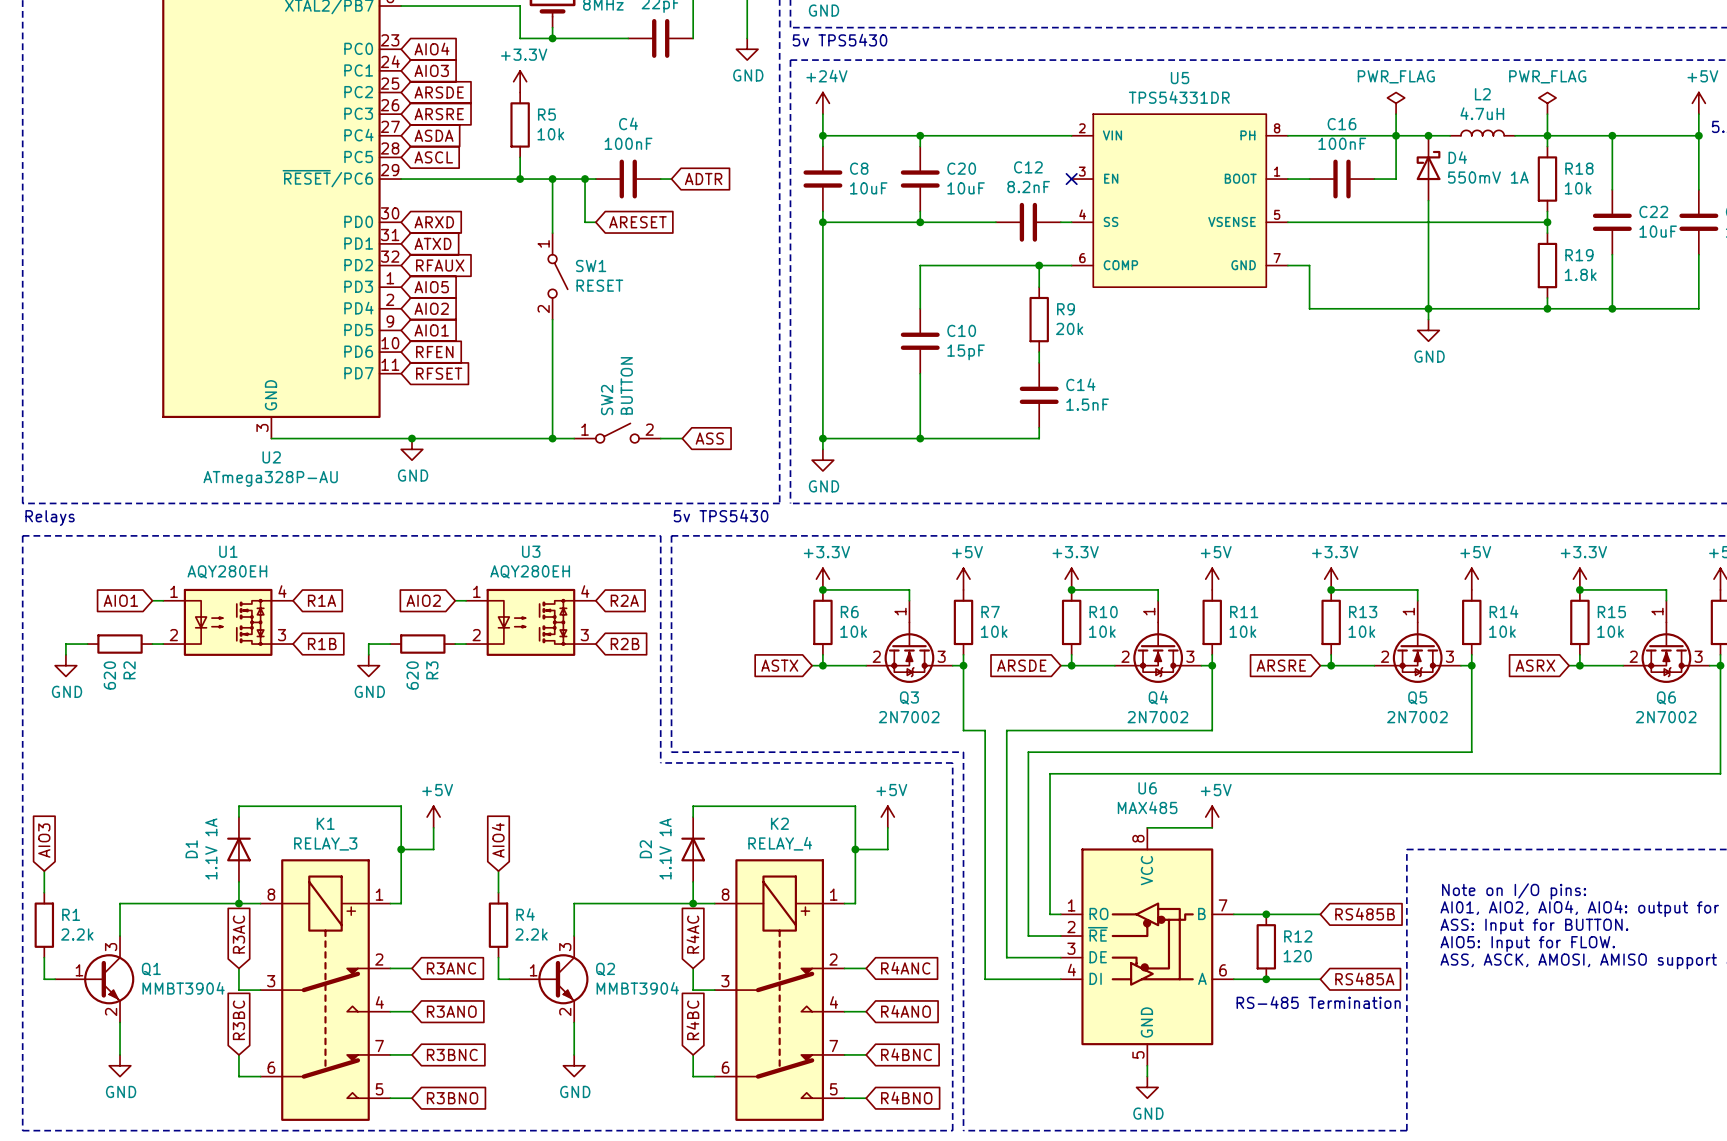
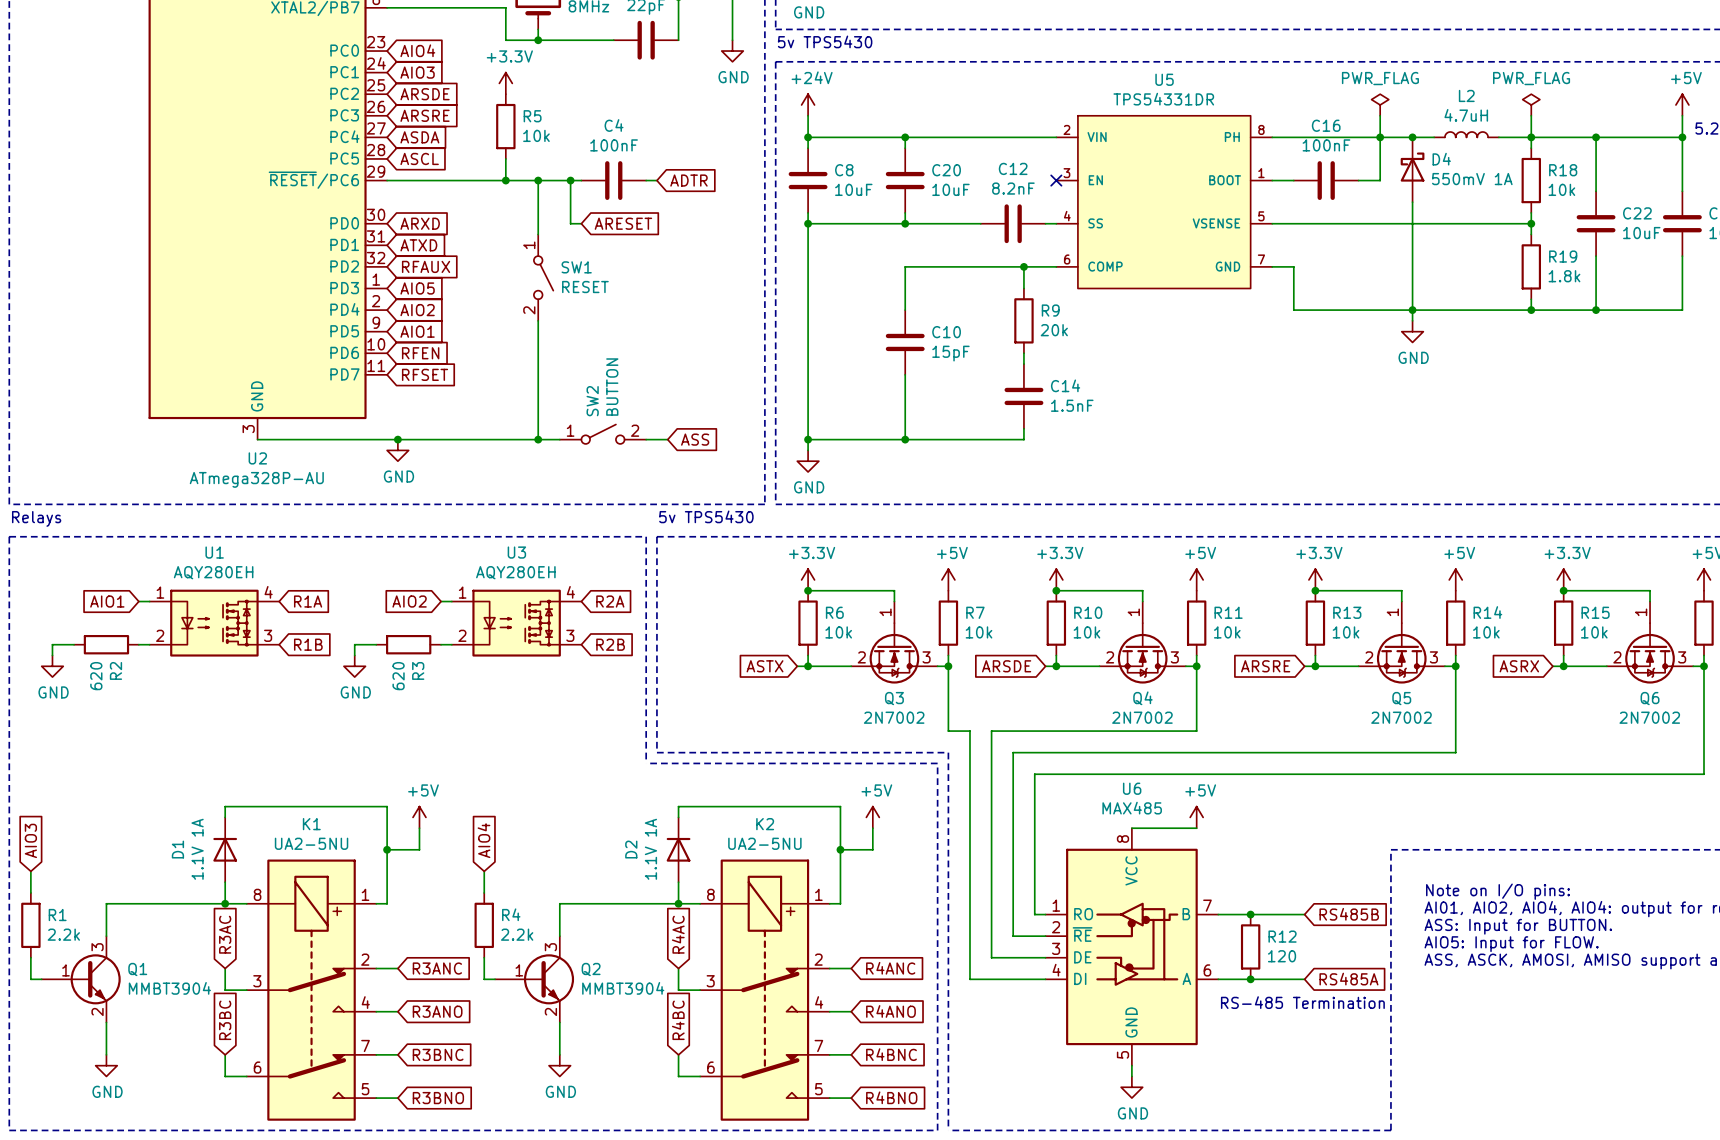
K1 value: RELAY_3 (325, 843) -> UA2-5NU (311, 843)
K2 value: RELAY_4 (780, 843) -> UA2-5NU (764, 843)

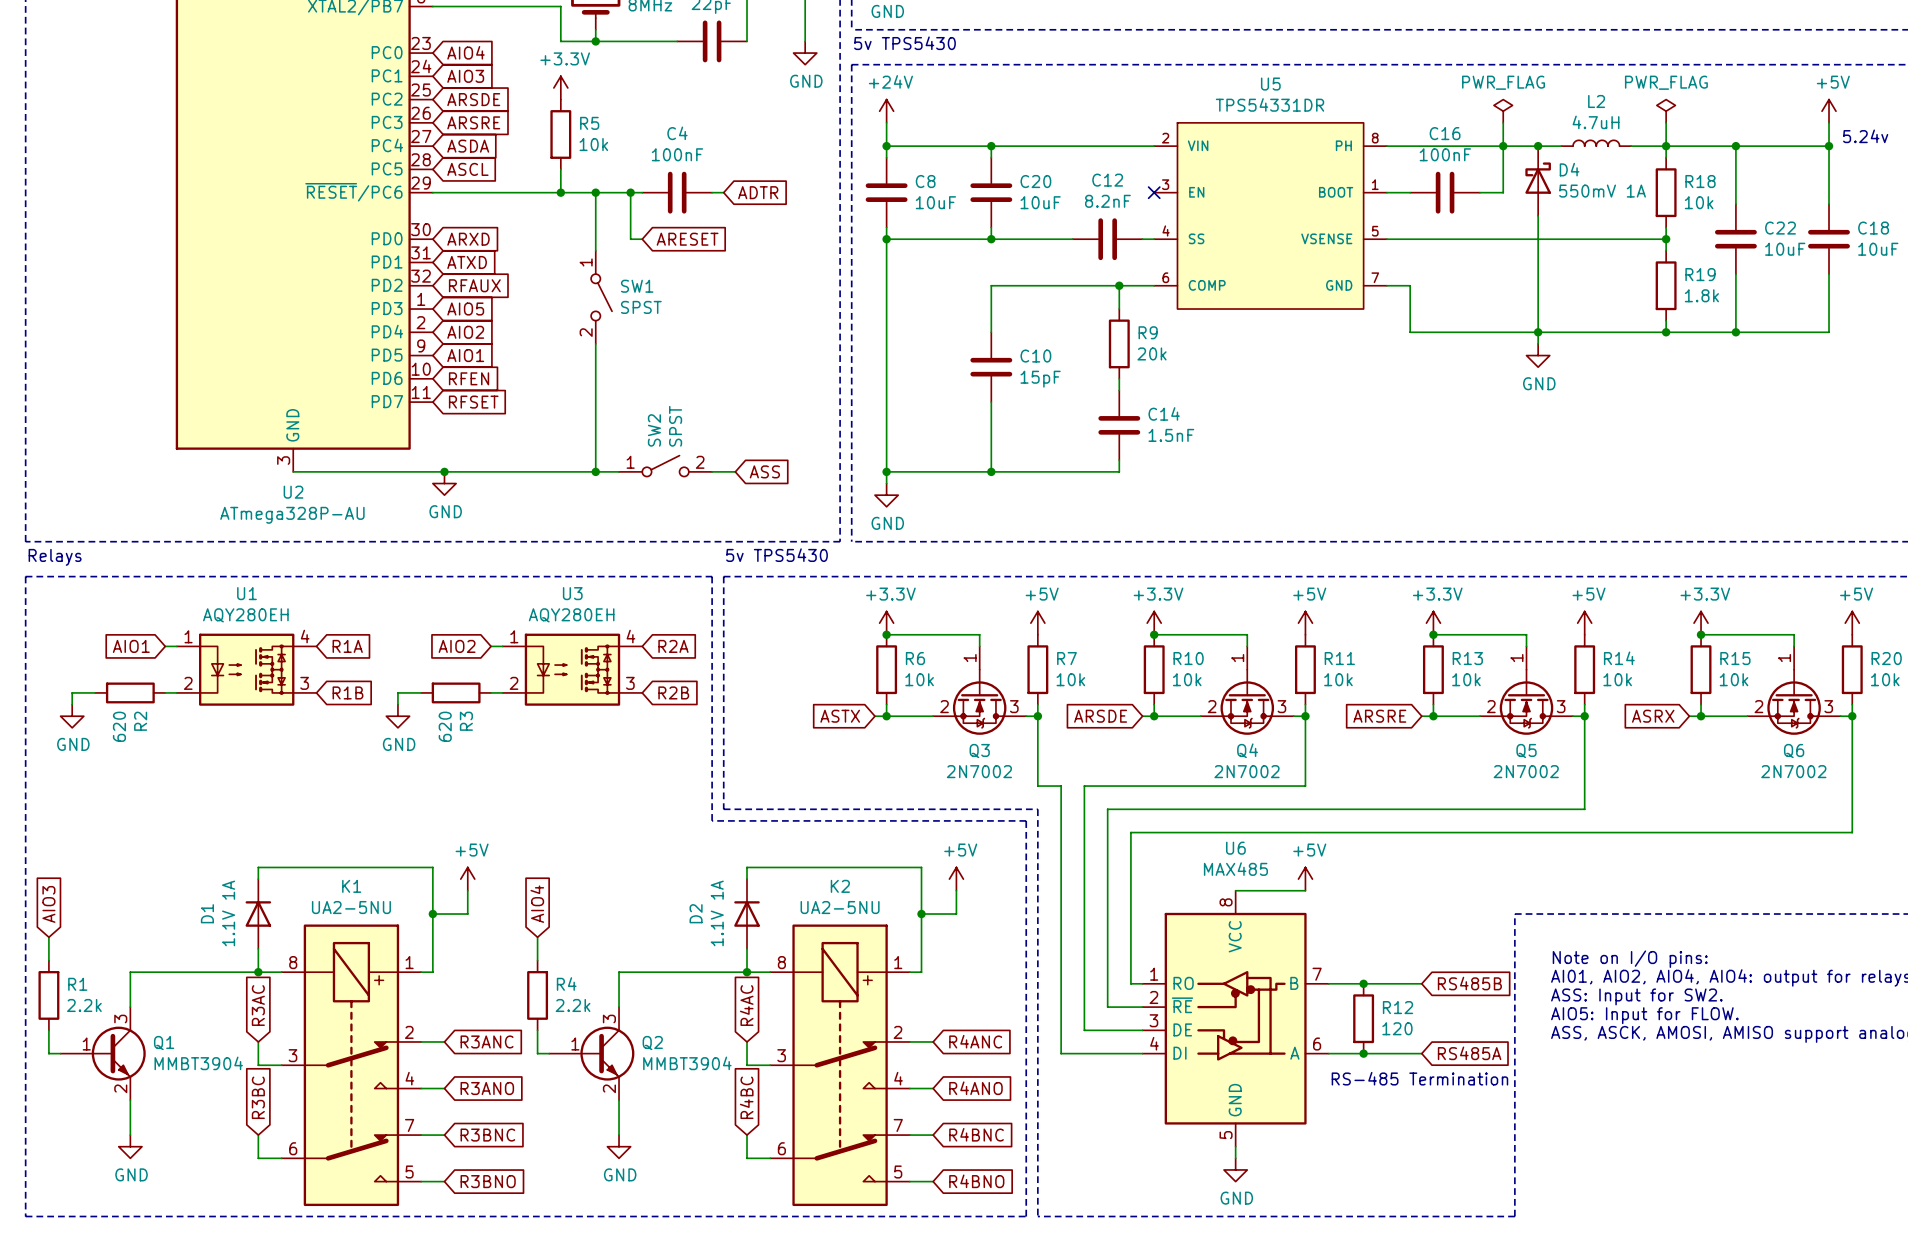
SW1 value: RESET (585, 287) -> SPST (641, 307)
SW2 value: BUTTON (612, 387) -> SPST (675, 426)
text: ASS: Input for BUTTON. (1518, 926) -> ASS: Input for SW2. (1636, 996)

